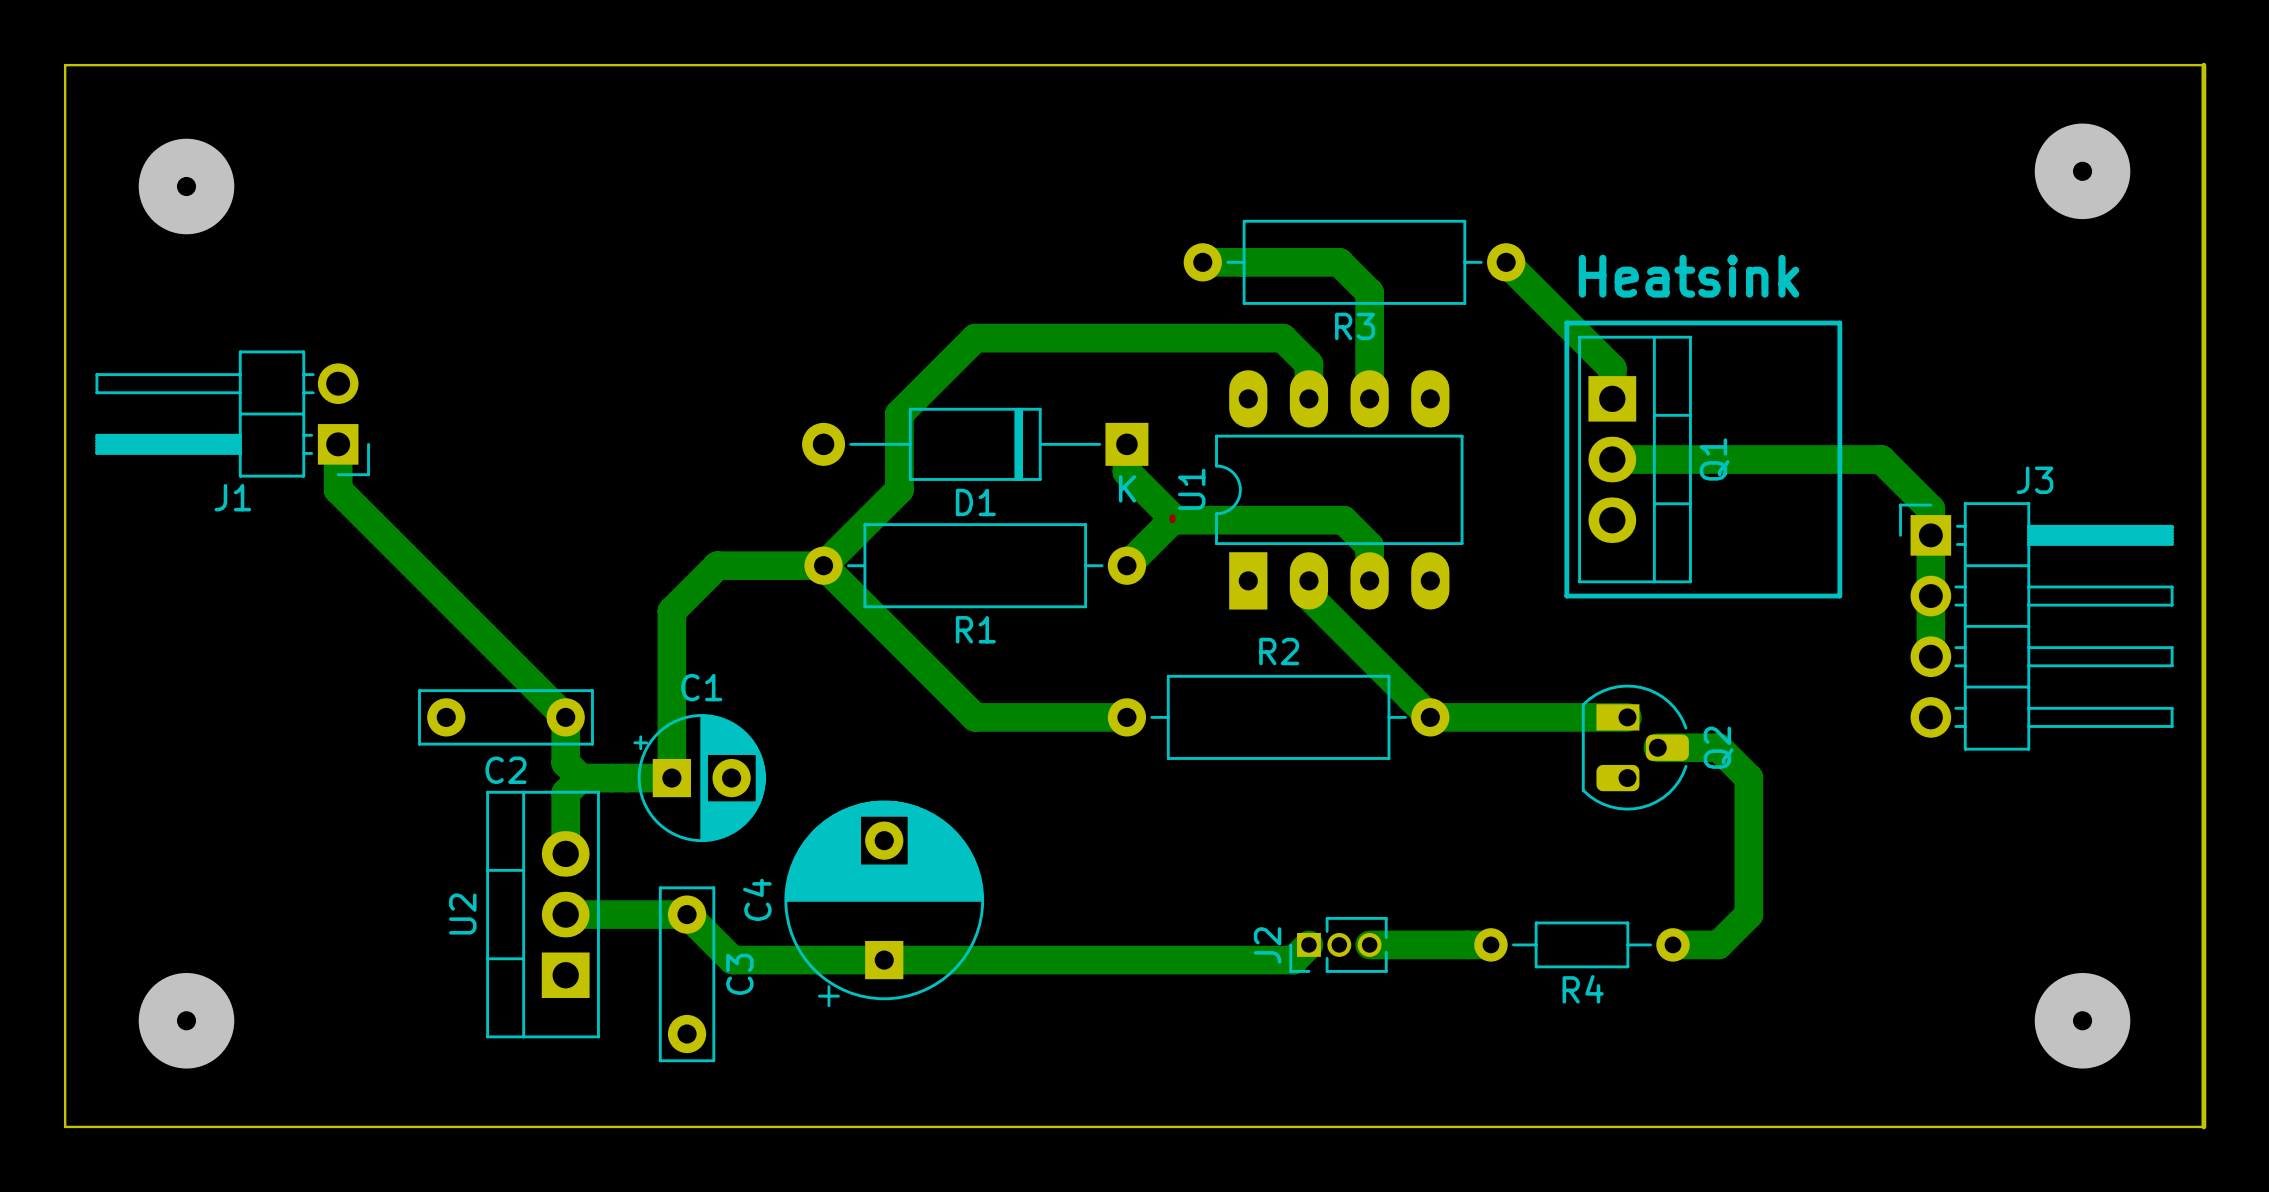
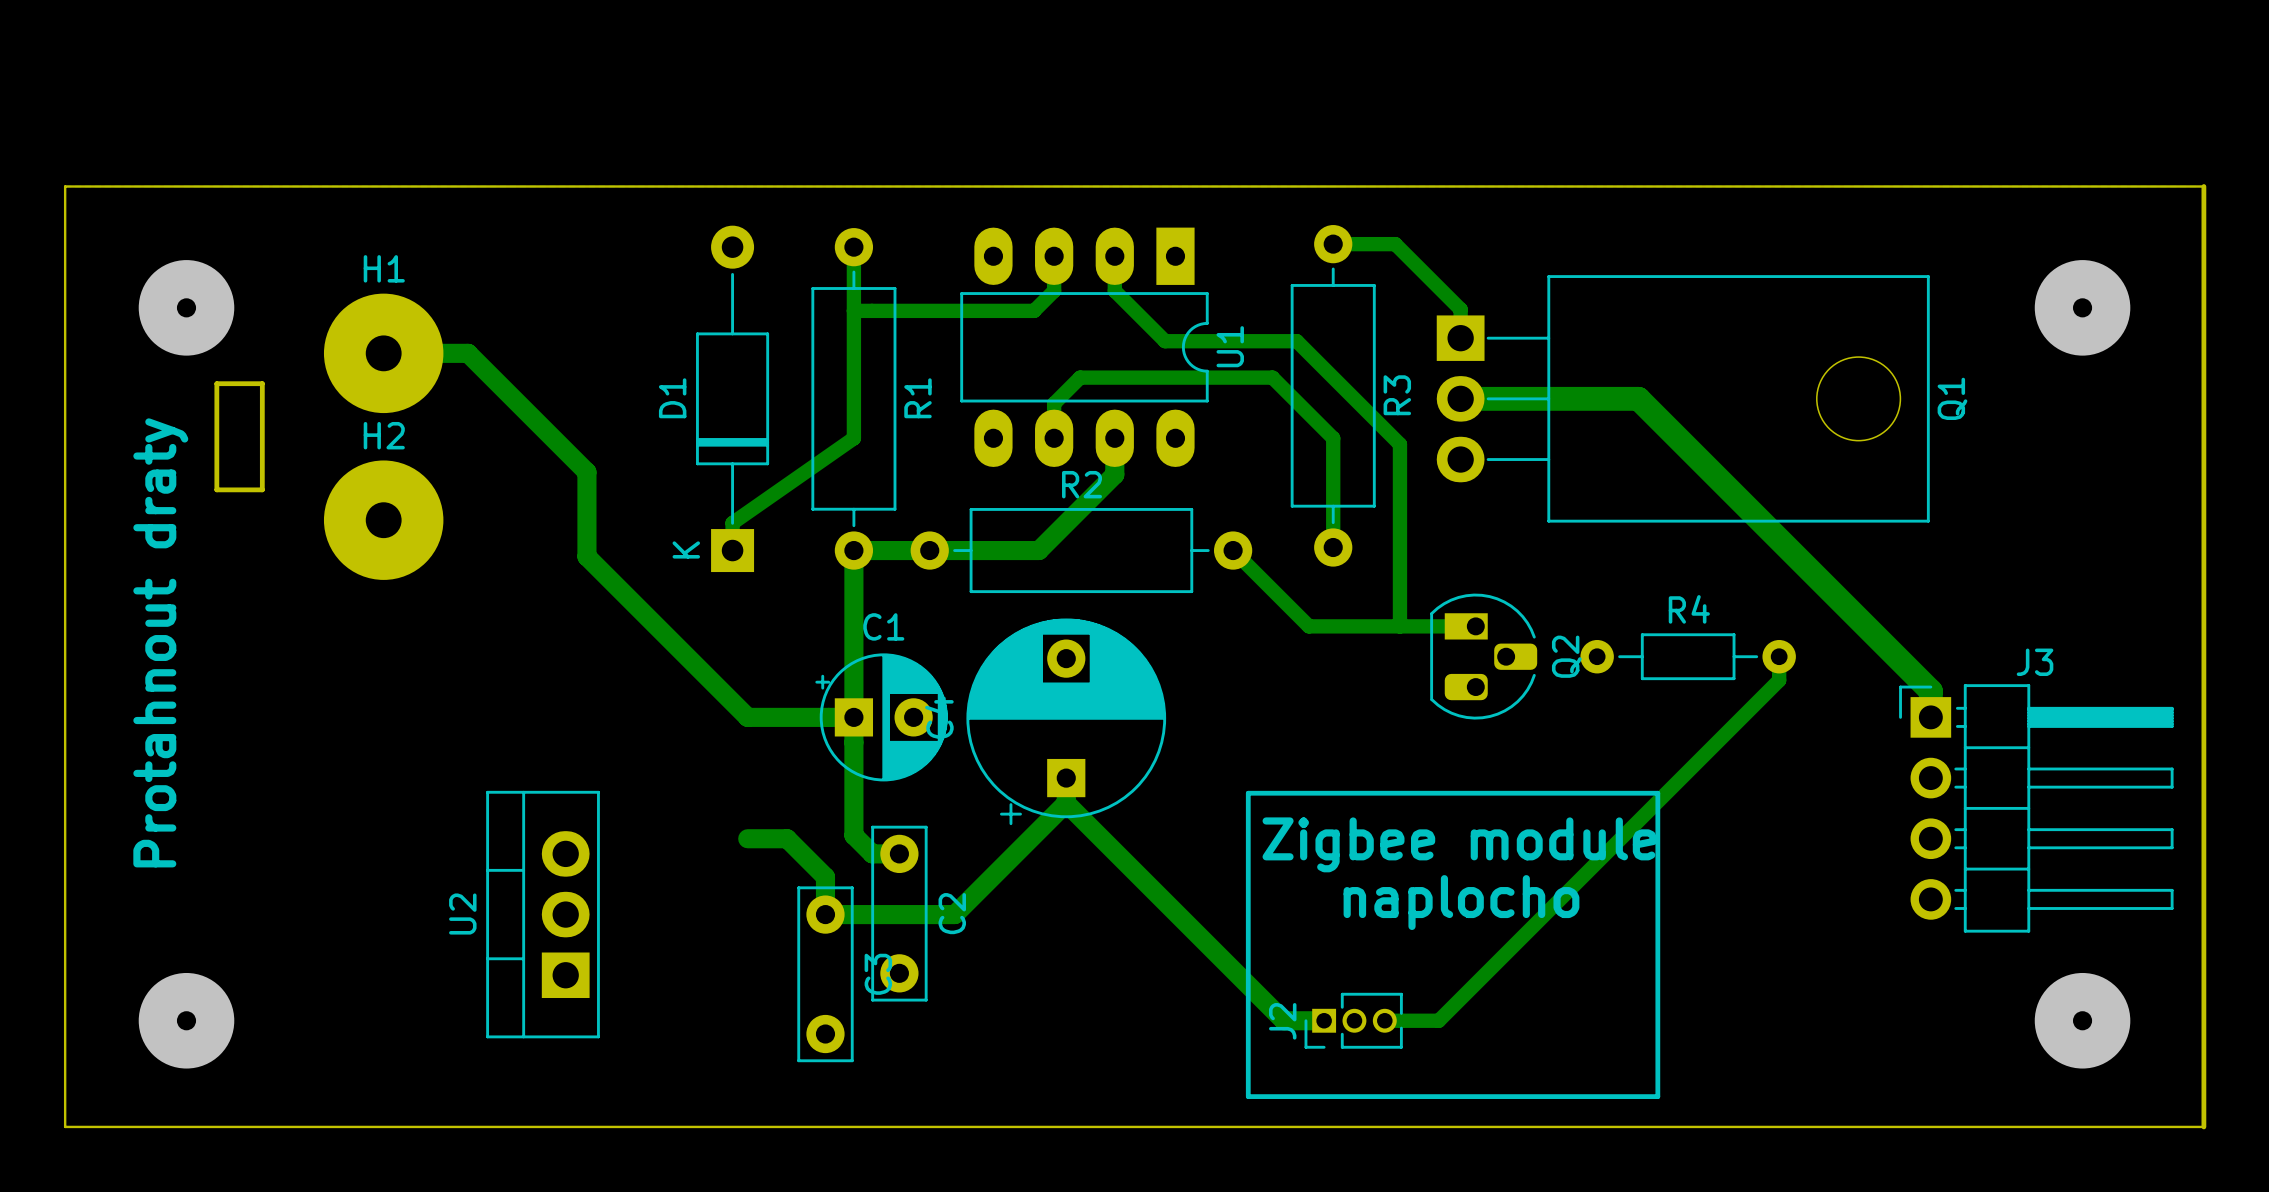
via position: (2082, 171) -> (2082, 307)
board edge: (65, 186) (65, 65) (2203, 65) (2203, 186) -> (65, 186) (2203, 186)
via position: (186, 186) -> (186, 307)
bottom track: none -> (1333, 244) (1395, 244) (1460, 309) (1459, 338)
bottom track: none -> (853, 247) (853, 438) (732, 523) (732, 550)
bottom track: none -> (1054, 256) (1054, 290) (1034, 310) (853, 310)
bottom track: none -> (1114, 256) (1114, 290) (1165, 341) (1296, 341) (1399, 444) (1399, 626)
bottom track: (1202, 262) (1339, 262) (1369, 292) (1369, 398) -> none
R3 rotation: 0° (1354, 262) -> 90° clockwise (1333, 395)
bottom track: (1506, 262) (1612, 368) (1612, 398) -> none
text: Heatsink (1689, 276) -> none
line: (1566, 323) (1566, 596) (1839, 596) (1839, 323) (1566, 323) -> none
R3 name position: R3 (1355, 326) -> R3 (1397, 395)
Q1 footprint: [1578, 335, 1692, 584] -> [1436, 275, 1930, 523]
bottom track: none -> (383, 353) (468, 353) (586, 472) (586, 556) (747, 717) (853, 717)
H1: none -> (383, 353)
board edge: none -> (216, 383) (262, 383) (262, 489) (216, 489) (216, 383)
bottom track: (1308, 398) (1308, 364) (1282, 338) (975, 338) (899, 414) (899, 489) (823, 565) -> none
bottom track: none -> (1460, 398) (1638, 398) (1930, 691) (1930, 717)
J1: (232, 414) -> none
bottom track: none -> (1054, 438) (1054, 403) (1080, 377) (1272, 377) (1333, 438) (1333, 547)
bottom track: none -> (1114, 438) (1114, 474) (1038, 550) (853, 550) (853, 835) (872, 853) (899, 853)
bottom track: (338, 444) (338, 489) (565, 717) (565, 762) (580, 778) -> none
D1 rotation: 0° (975, 444) -> 90° clockwise (732, 398)
D1 position: (975, 444) -> (732, 398)
bottom track: (1126, 444) (1126, 471) (1172, 517) -> none
bottom track: (1612, 459) (1881, 459) (1930, 509) (1930, 656) -> none
Q1 name position: Q1 (1714, 459) -> Q1 (1952, 398)
U1 rotation: 0° (1339, 489) -> 180° (1084, 347)
U1 position: (1339, 489) -> (1084, 347)
top track: (1172, 517) (1172, 520) -> none
H2: none -> (383, 520)
bottom track: none -> (1233, 550) (1308, 626) (1475, 626)
bottom track: (823, 565) (717, 565) (671, 611) (671, 778) (580, 778) -> none
bottom track: (823, 565) (975, 717) (1126, 717) -> none
R1 rotation: 0° (975, 565) -> 90° clockwise (853, 398)
R1 position: (975, 565) -> (853, 398)
bottom track: (1126, 565) (1172, 520) (1343, 520) (1369, 546) (1369, 580) -> none
bottom track: (1308, 596) (1430, 717) (1627, 717) -> none
J3 position: (2036, 626) -> (2036, 808)
R1 name position: R1 (975, 629) -> R1 (917, 398)
text: none -> Protahnout draty (160, 642)
bottom track: none -> (1779, 656) (1779, 680) (1438, 1020) (1384, 1020)
C2 rotation: 0° (505, 717) -> 90° clockwise (899, 913)
C2 position: (505, 717) -> (899, 913)
R2 position: (1278, 717) -> (1081, 550)
Q2 position: (1635, 747) -> (1483, 656)
bottom track: (1657, 747) (1718, 747) (1748, 778) (1748, 914) (1718, 944) (1672, 944) -> none
C2 name position: C2 (505, 770) -> C2 (952, 913)
bottom track: (580, 778) (565, 793) (565, 853) (565, 823) -> none
C1 position: (699, 778) -> (881, 717)
line: none -> (1248, 793) (1657, 793) (1657, 1096) (1248, 1096) (1248, 793)
bottom track: none -> (1066, 803) (954, 914) (825, 914) (825, 877) (787, 838) (747, 838)
bottom track: none -> (1066, 803) (1283, 1020) (1324, 1020)
text: none -> Zigbee module (1459, 844)
text: none -> naplocho (1461, 902)
C4 position: (884, 903) -> (1066, 721)
bottom track: (565, 914) (687, 914) (732, 960) (1293, 960) (1308, 944) -> none
J2 position: (1338, 944) -> (1353, 1020)
bottom track: (1369, 944) (1490, 944) -> none
R4 position: (1581, 944) -> (1688, 656)
C3 position: (687, 974) -> (825, 974)
R4 name position: R4 (1583, 989) -> R4 (1689, 609)

